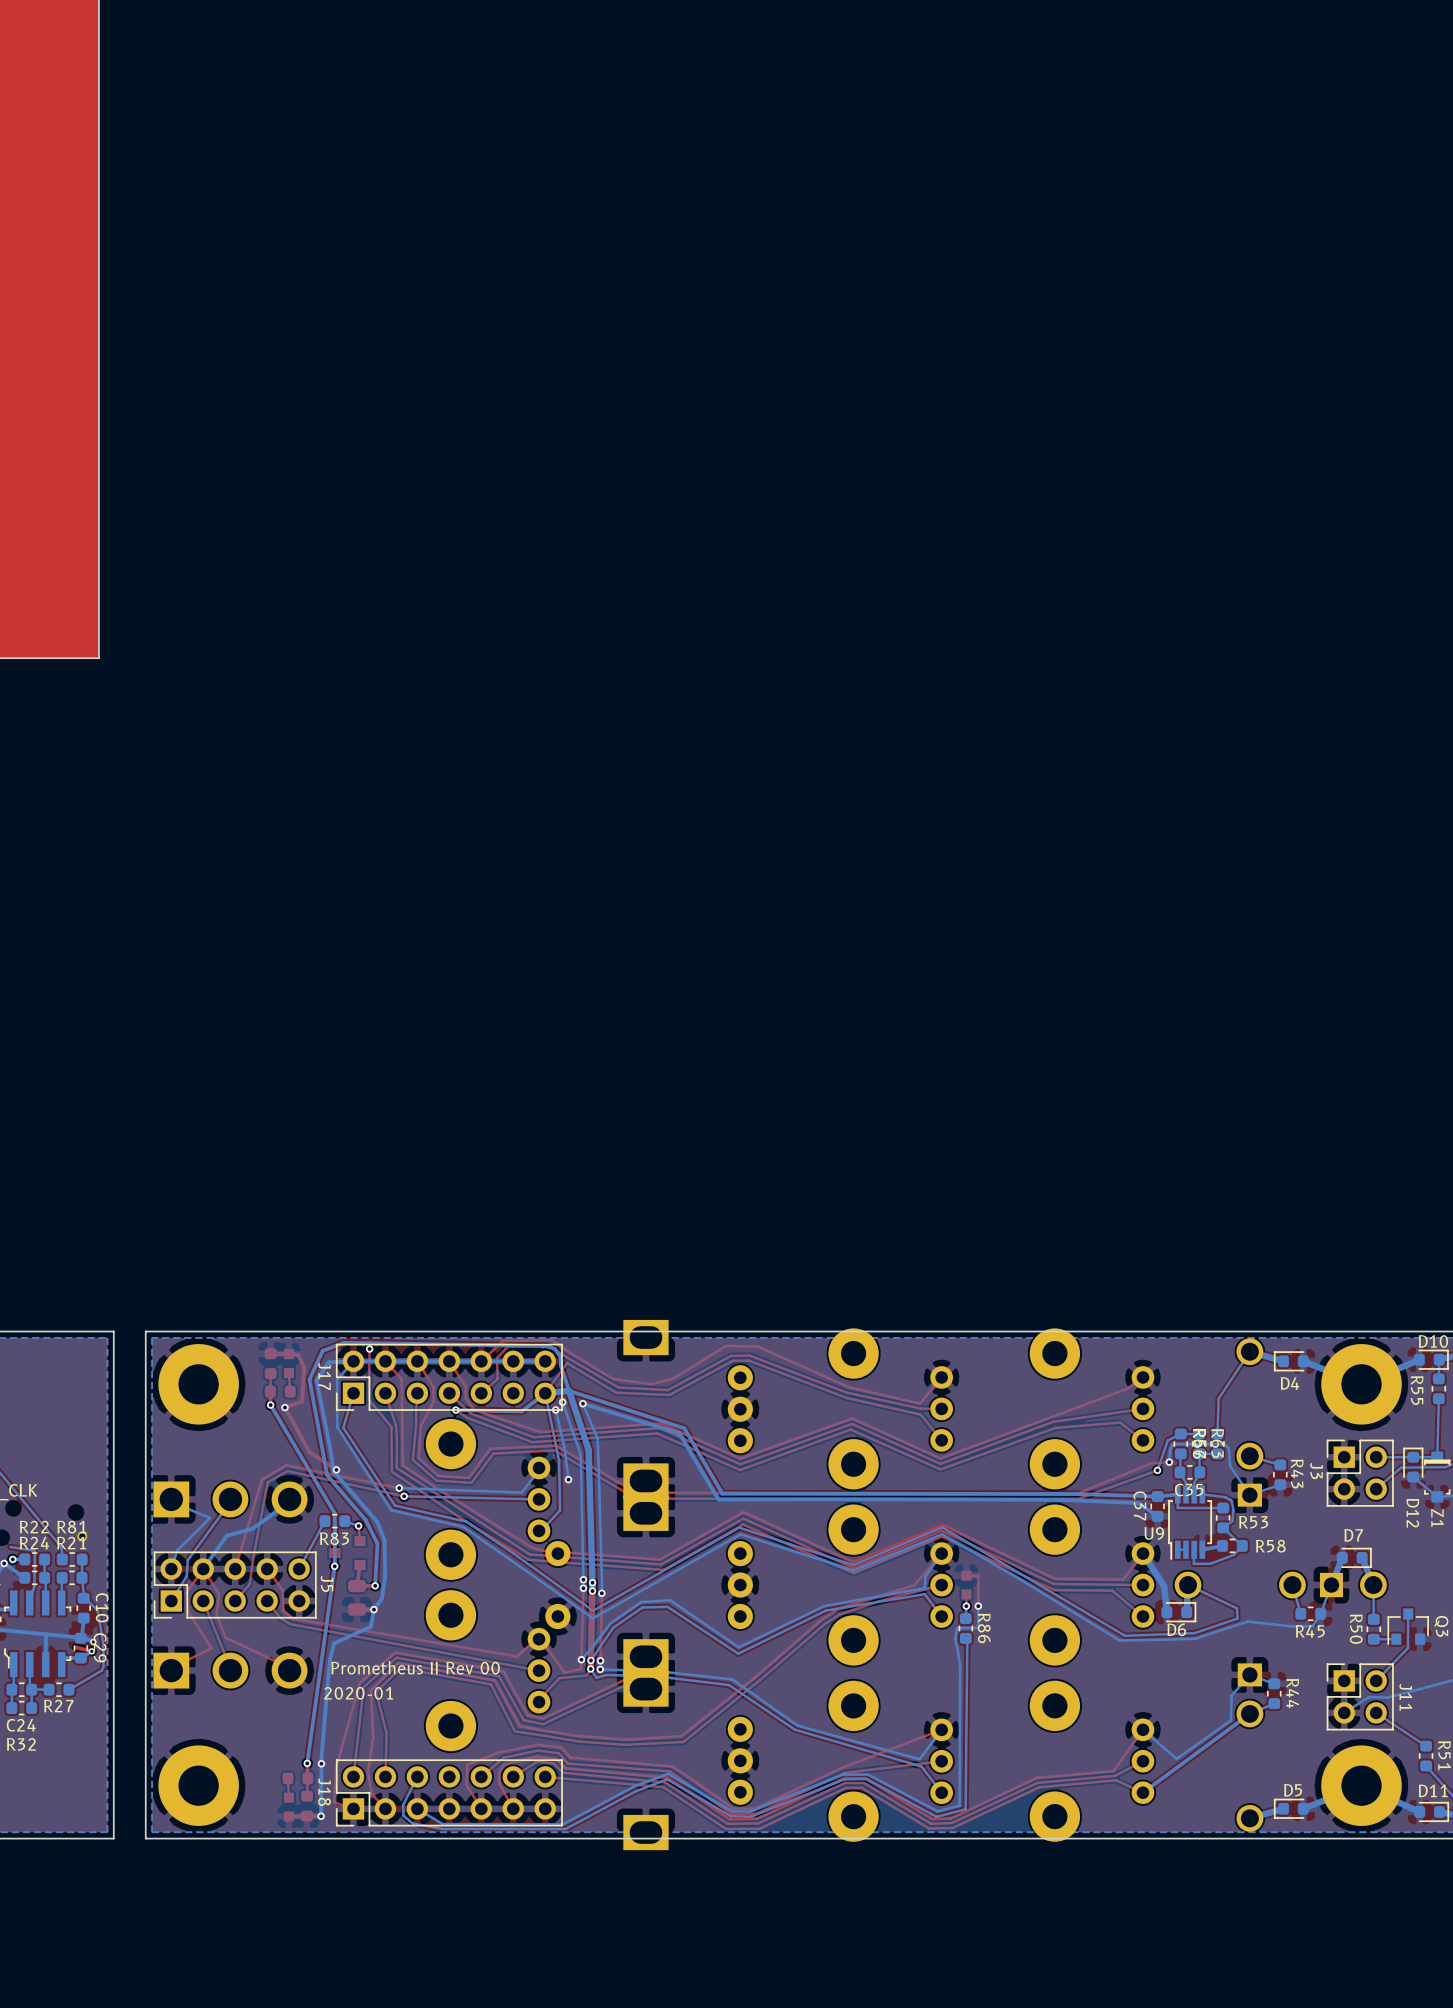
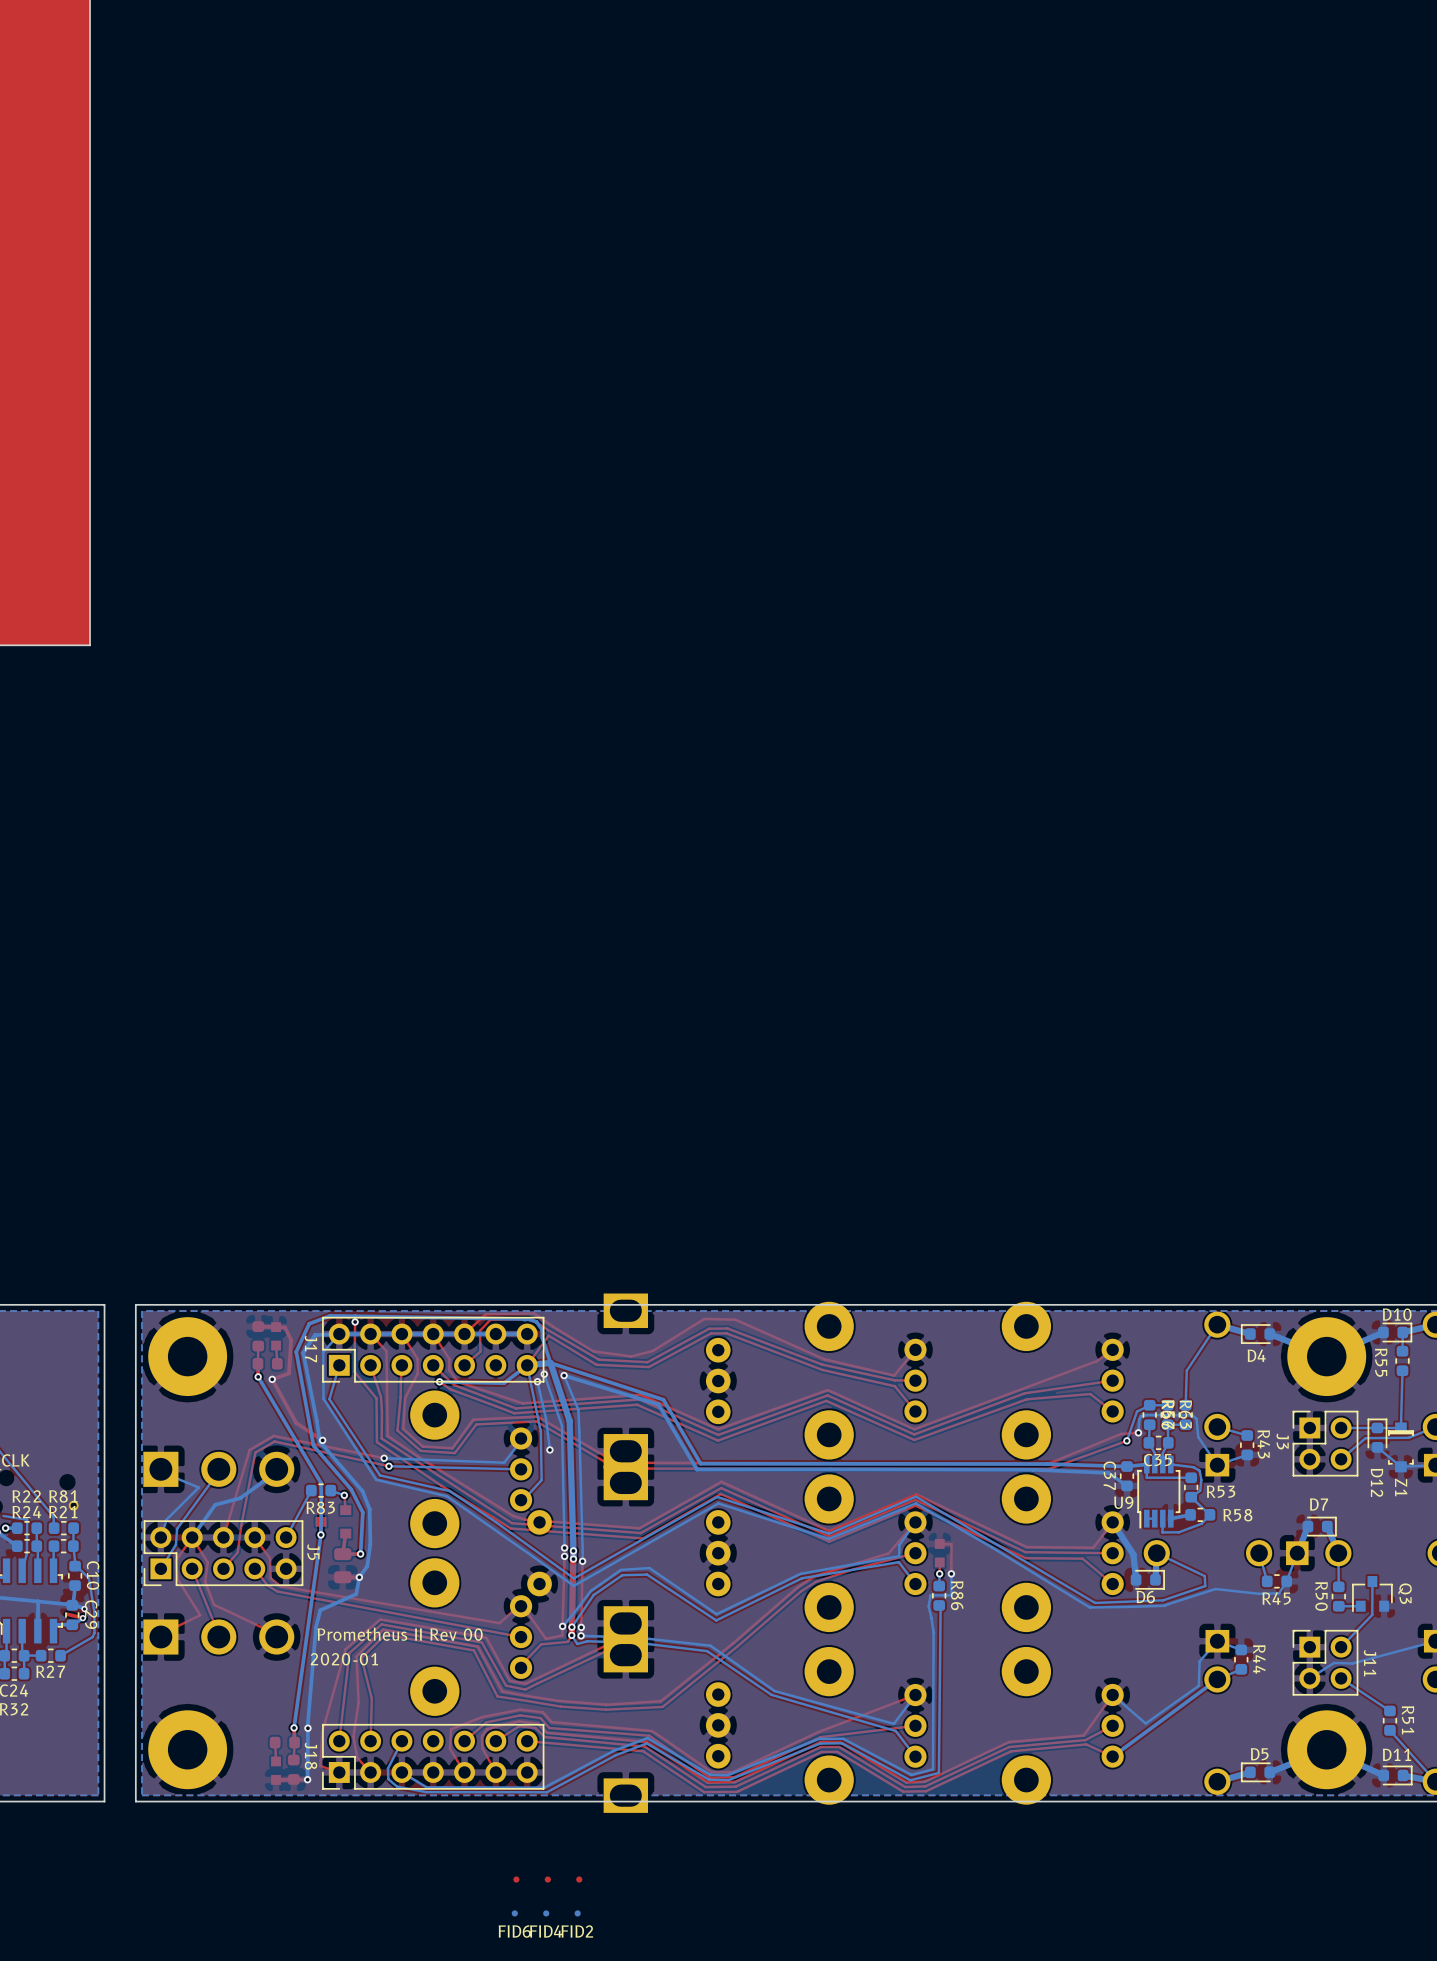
part: none -> (516, 1879)
part: none -> (547, 1879)
part: none -> (579, 1879)
FID6: none -> (514, 1913)
FID4: none -> (546, 1913)
FID2: none -> (577, 1913)

